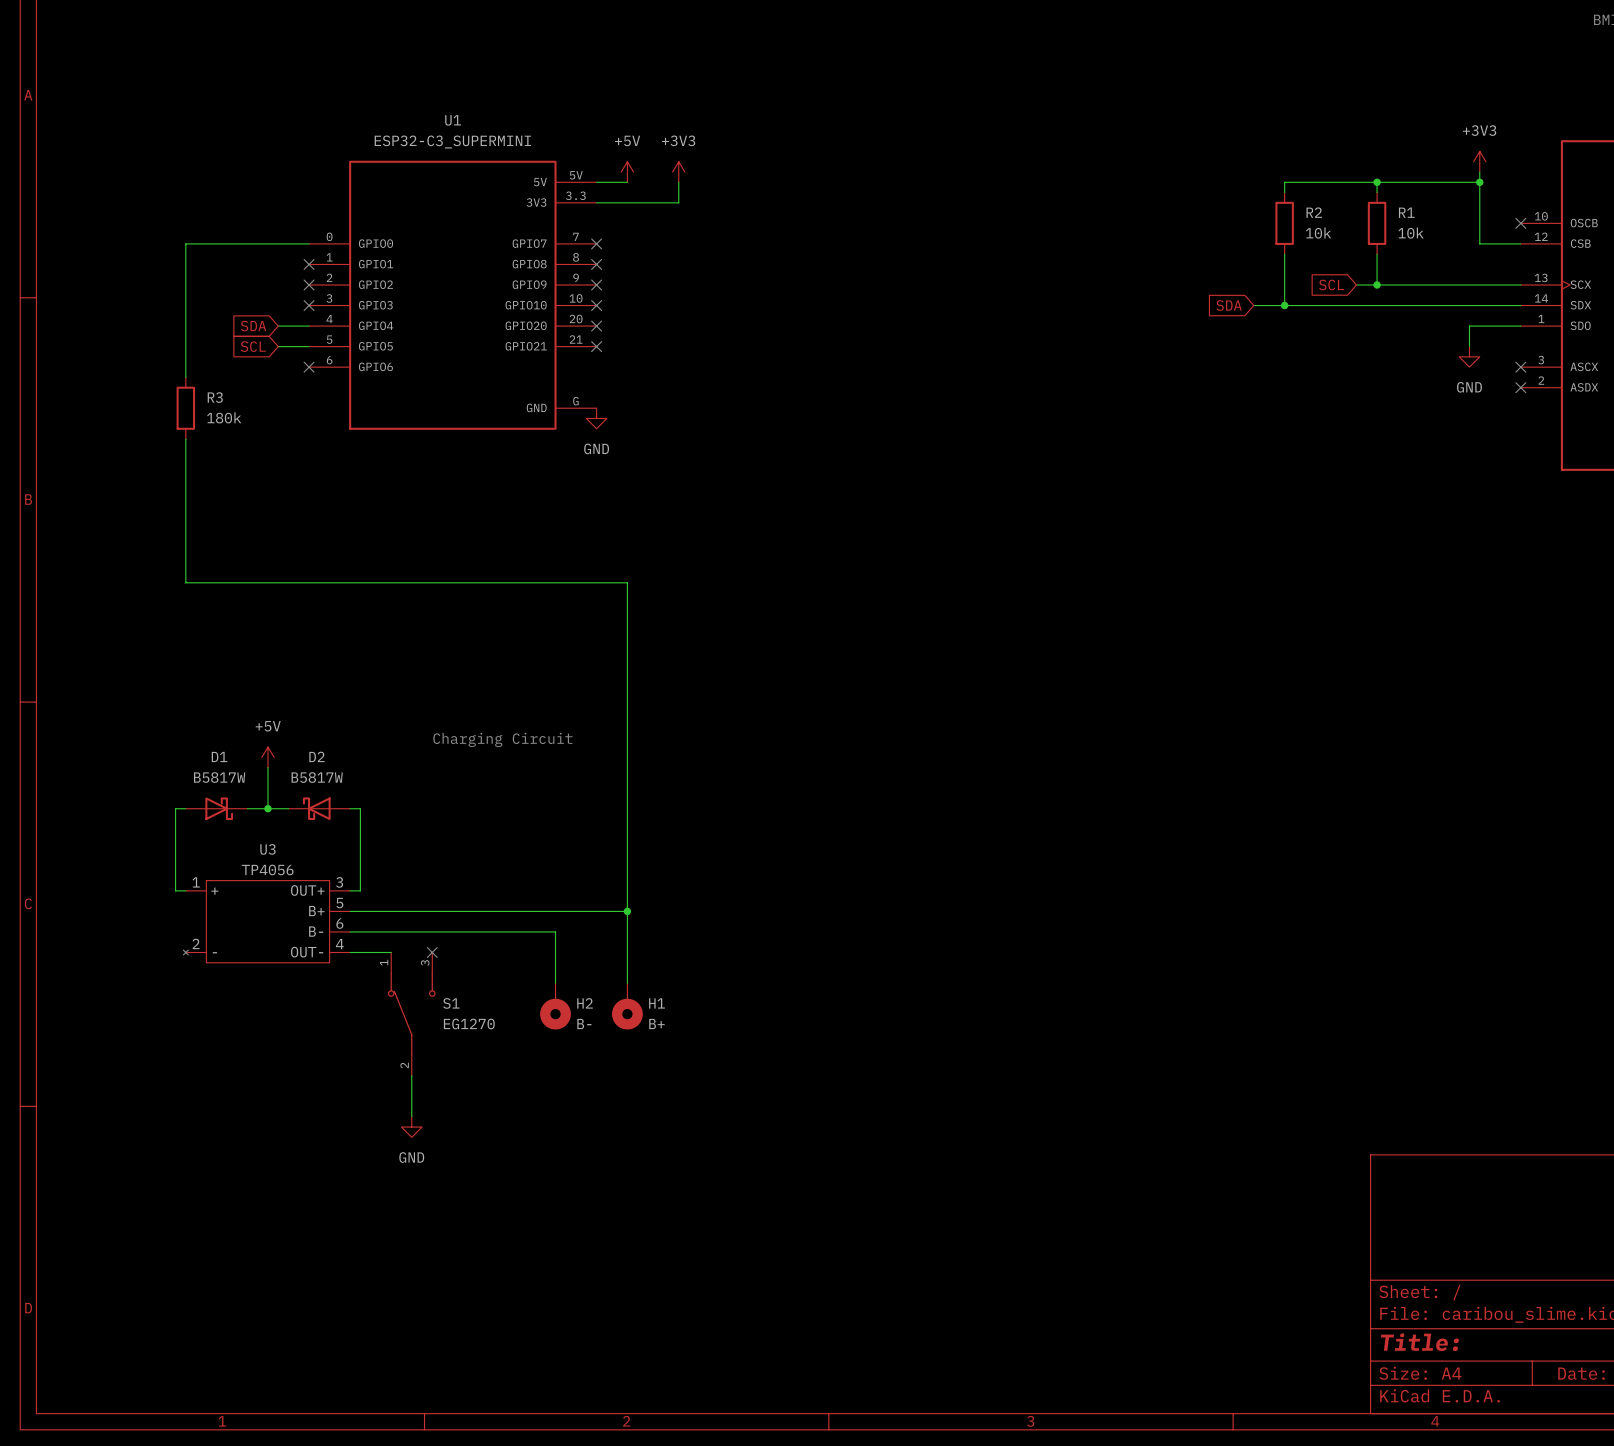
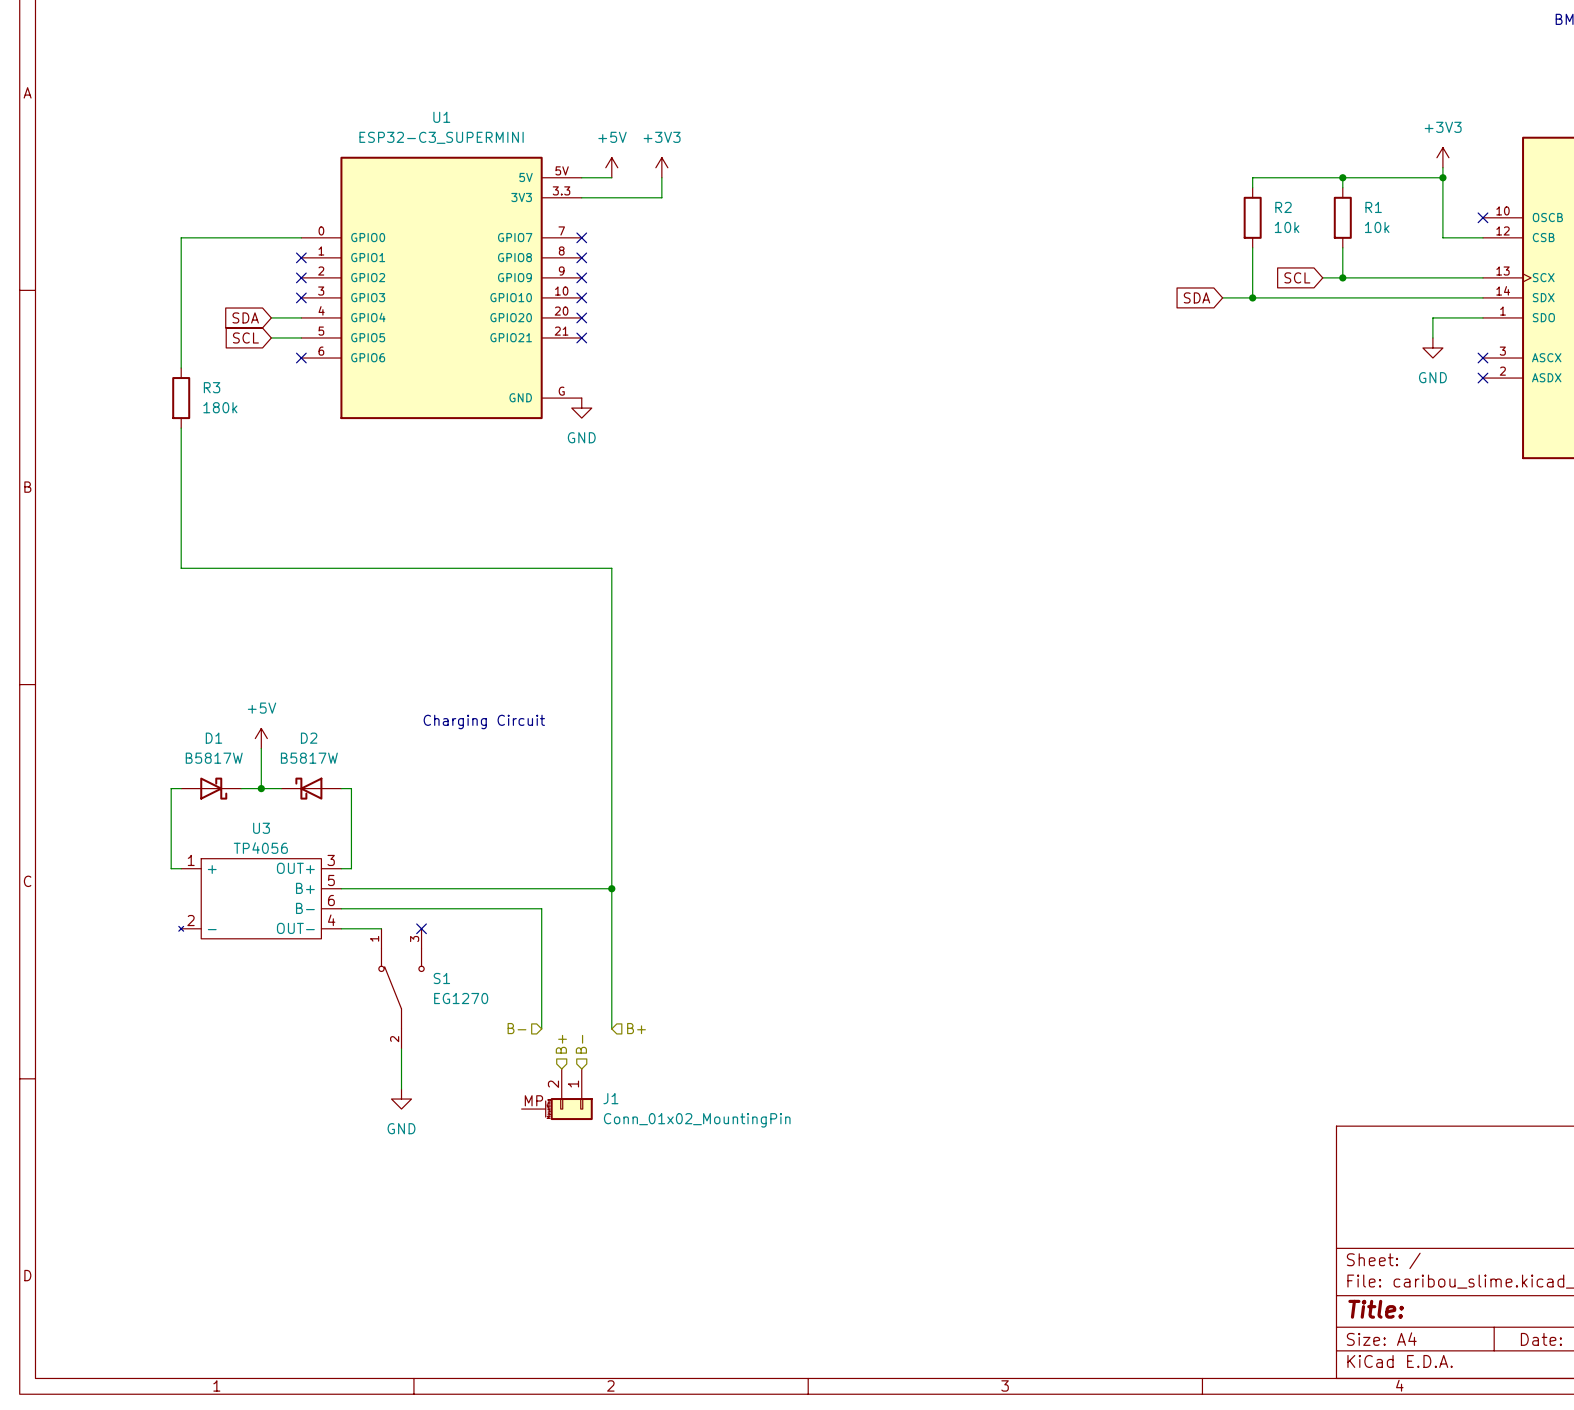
wire: none -> (541, 958) (541, 1028)
wire: none -> (611, 958) (611, 1028)
H2: B- (555, 1006) -> none
H1: B+ (627, 1006) -> none
hierarchical label: none -> B- (516, 1028)
hierarchical label: none -> B+ (636, 1028)
hierarchical label: none -> B+ (561, 1044)
hierarchical label: none -> B- (581, 1044)
J1: none -> Conn_01x02_MountingPin (557, 1094)

